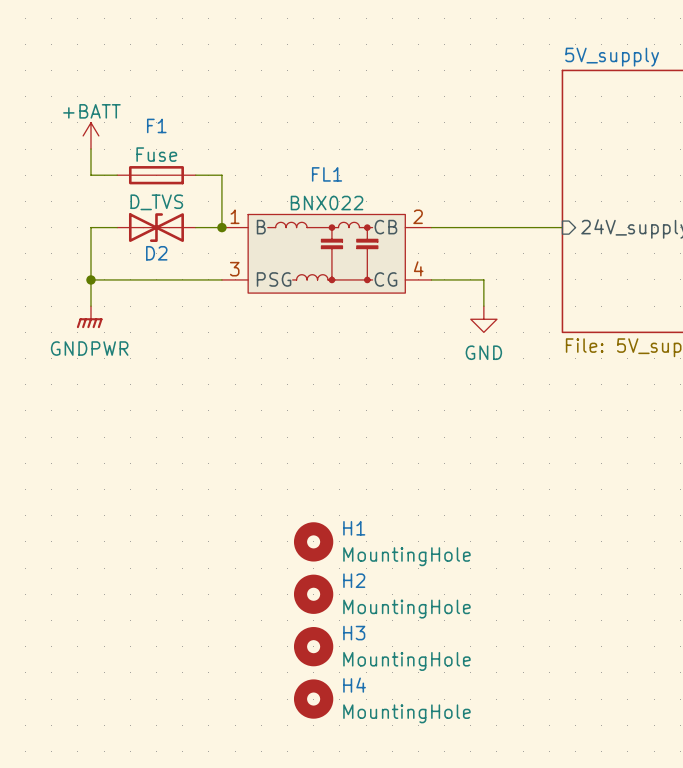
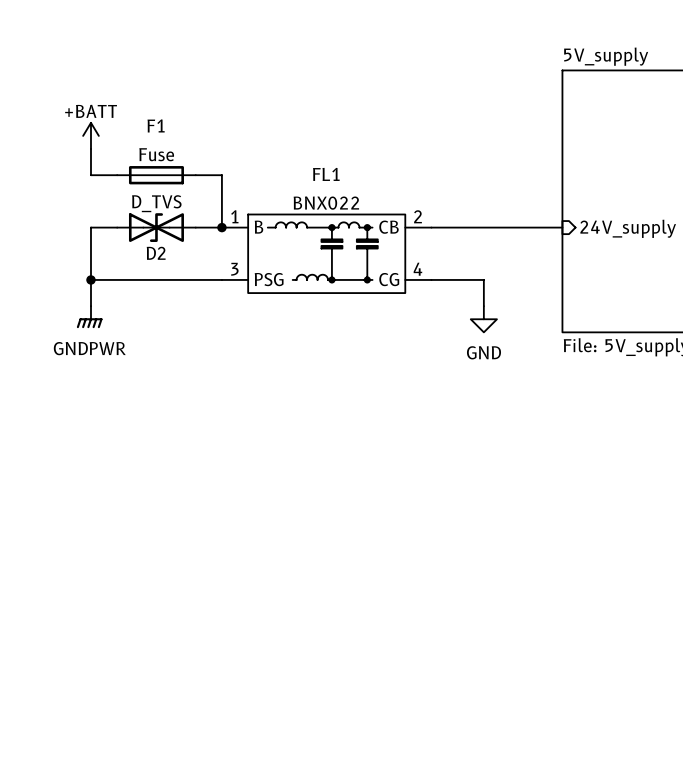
H1: MountingHole (313, 541) -> none
H2: MountingHole (313, 594) -> none
H3: MountingHole (313, 646) -> none
H4: MountingHole (313, 699) -> none

